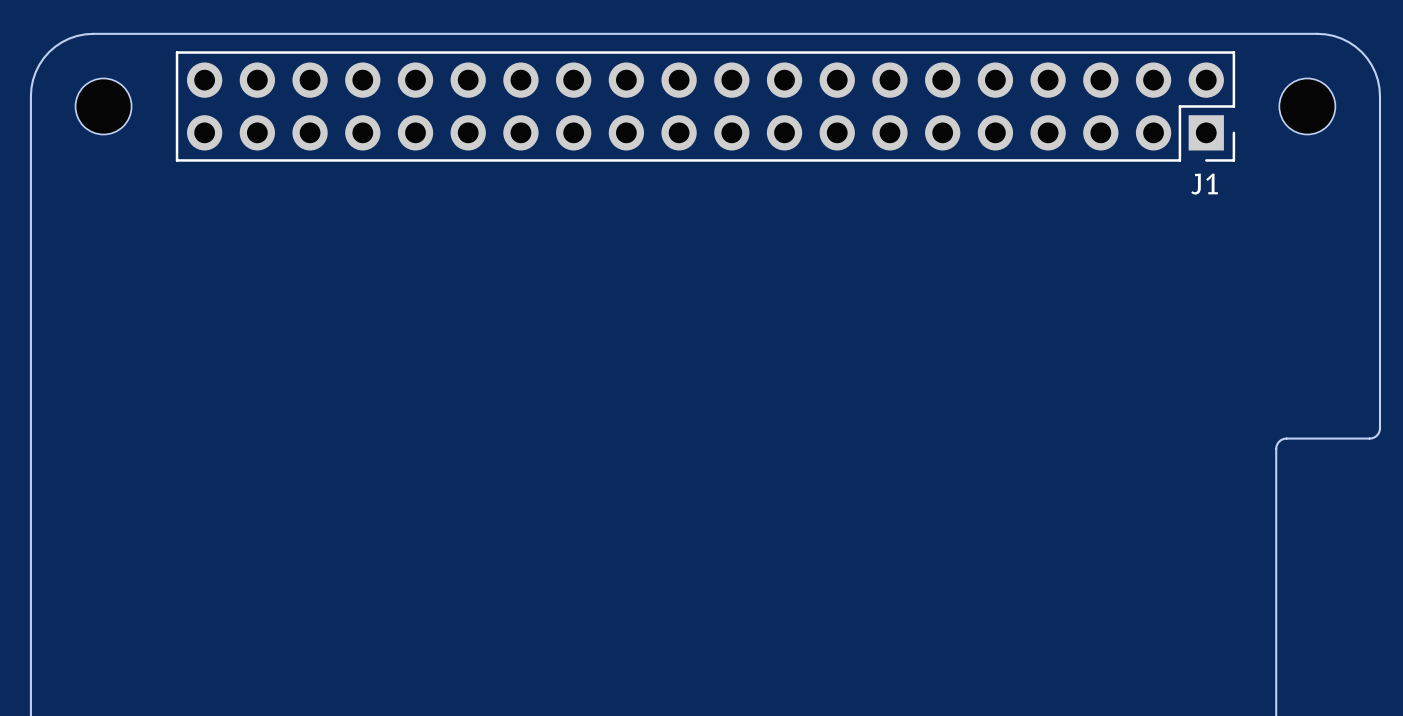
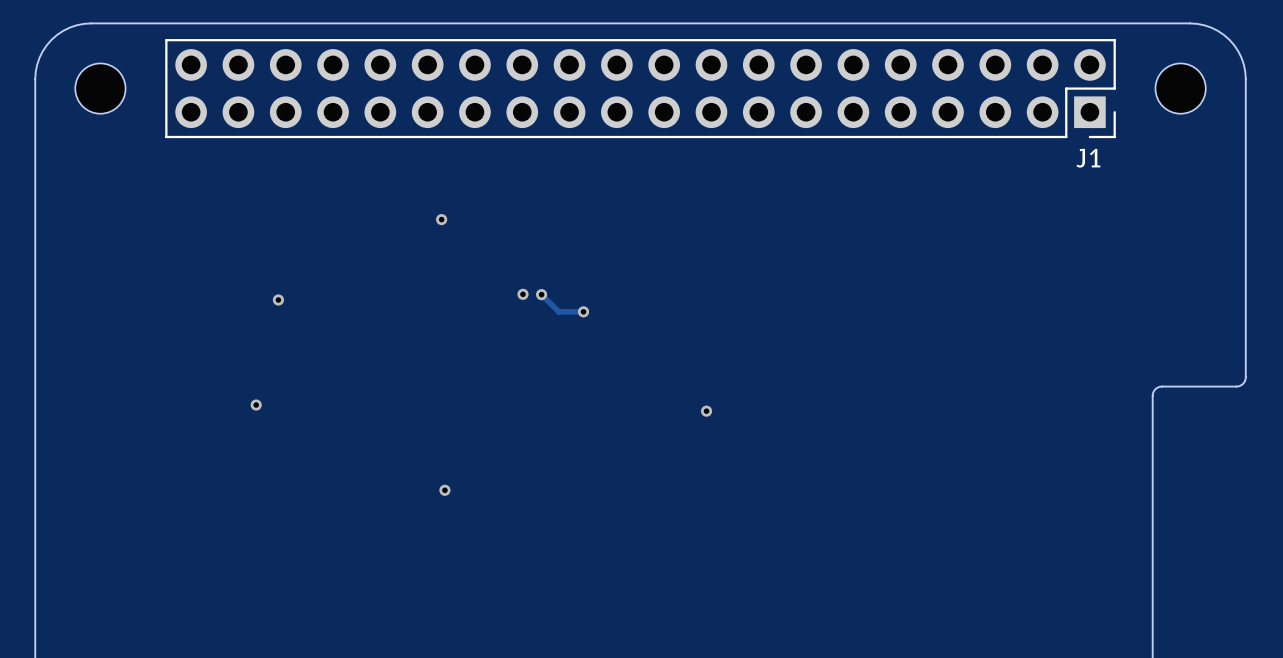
via: none -> (441, 219)
via: none -> (522, 294)
track: none -> (541, 294) (558, 311) (583, 311)
via: none -> (541, 294)
via: none -> (278, 300)
via: none -> (583, 311)
via: none -> (256, 405)
via: none -> (706, 411)
via: none -> (444, 490)

